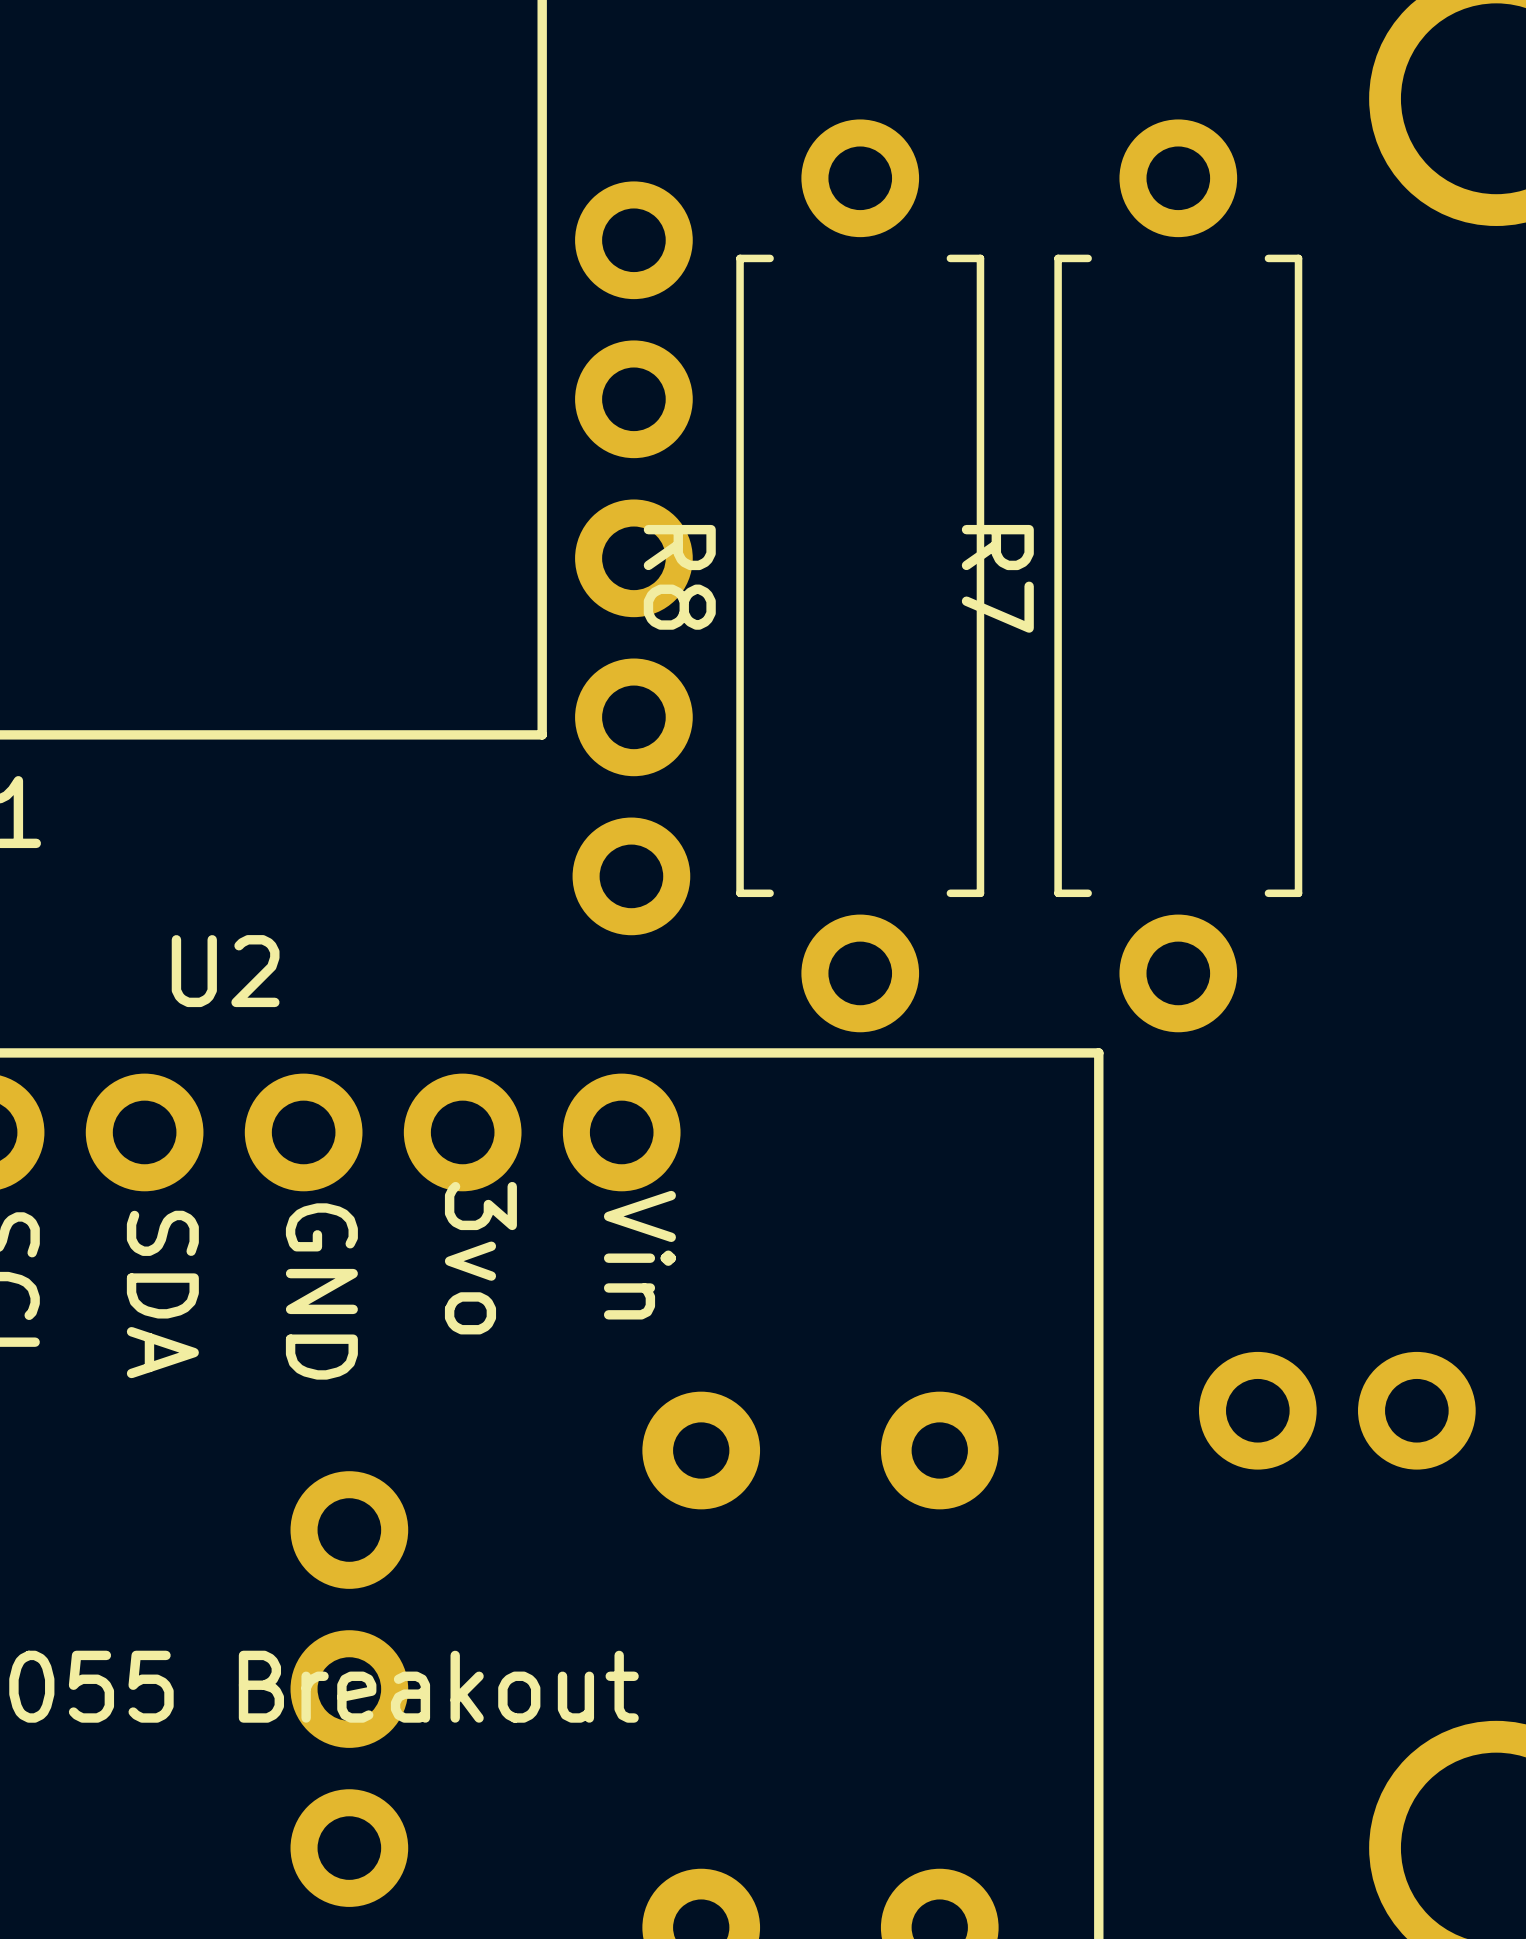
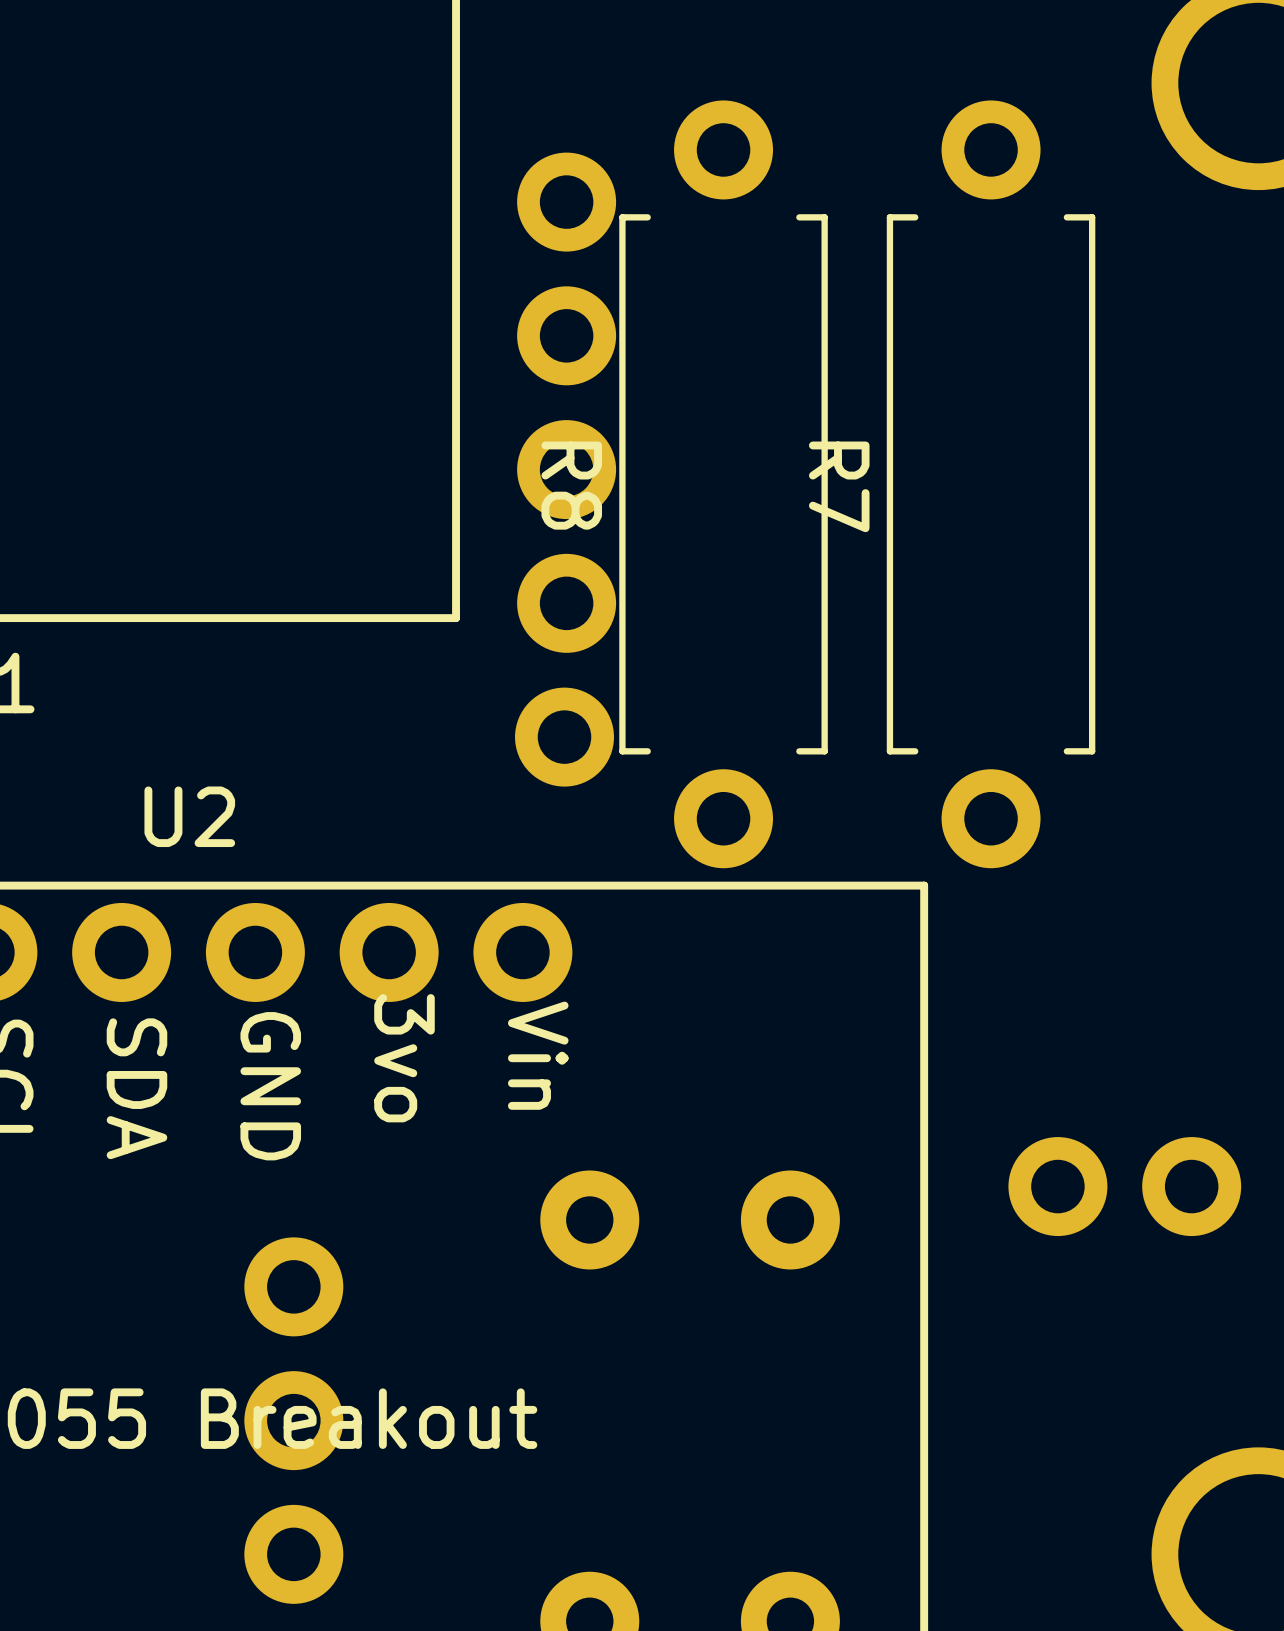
part position: (632, 558) -> (565, 469)

